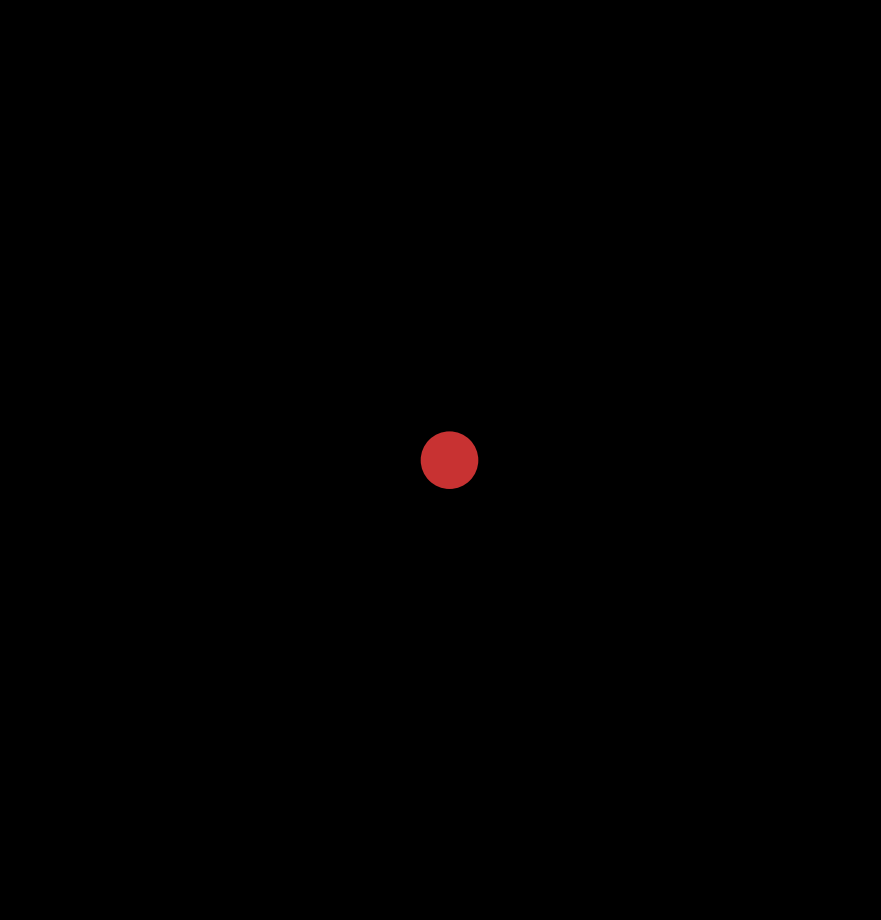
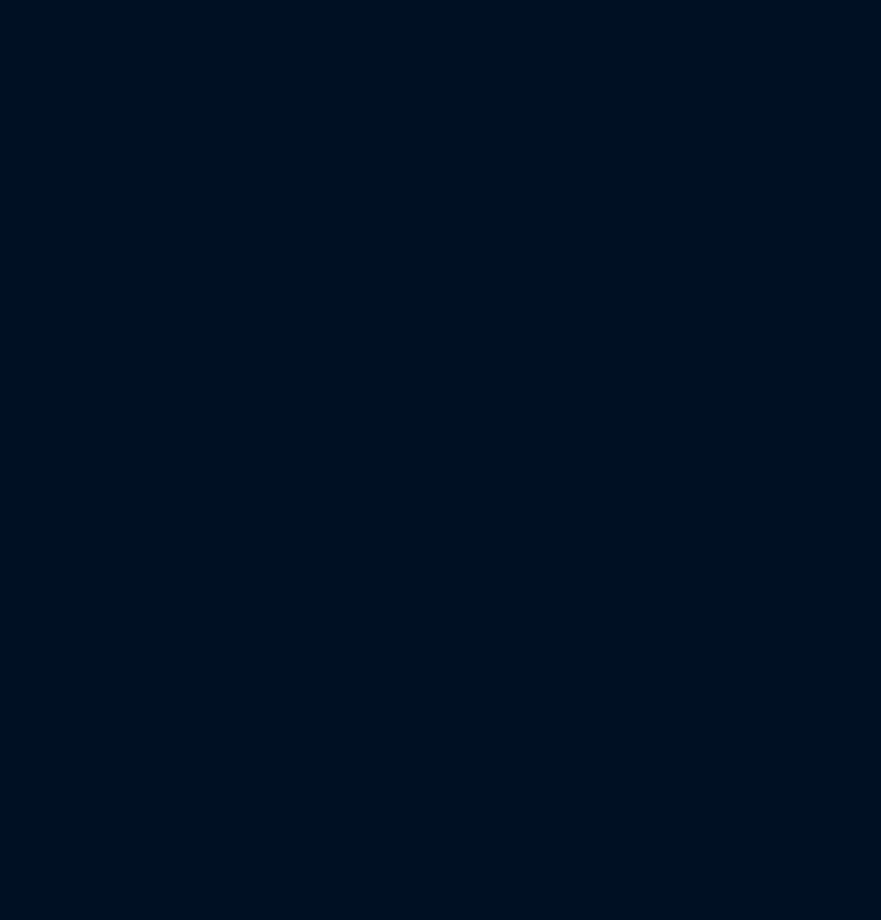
part: (449, 460) -> none

